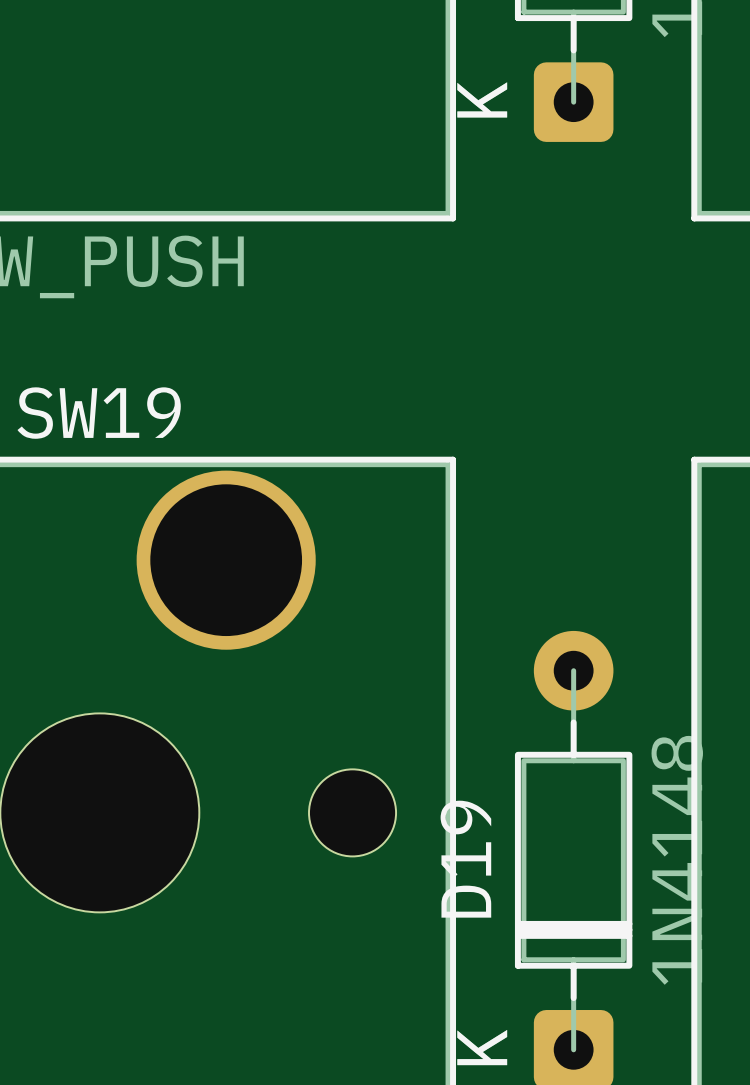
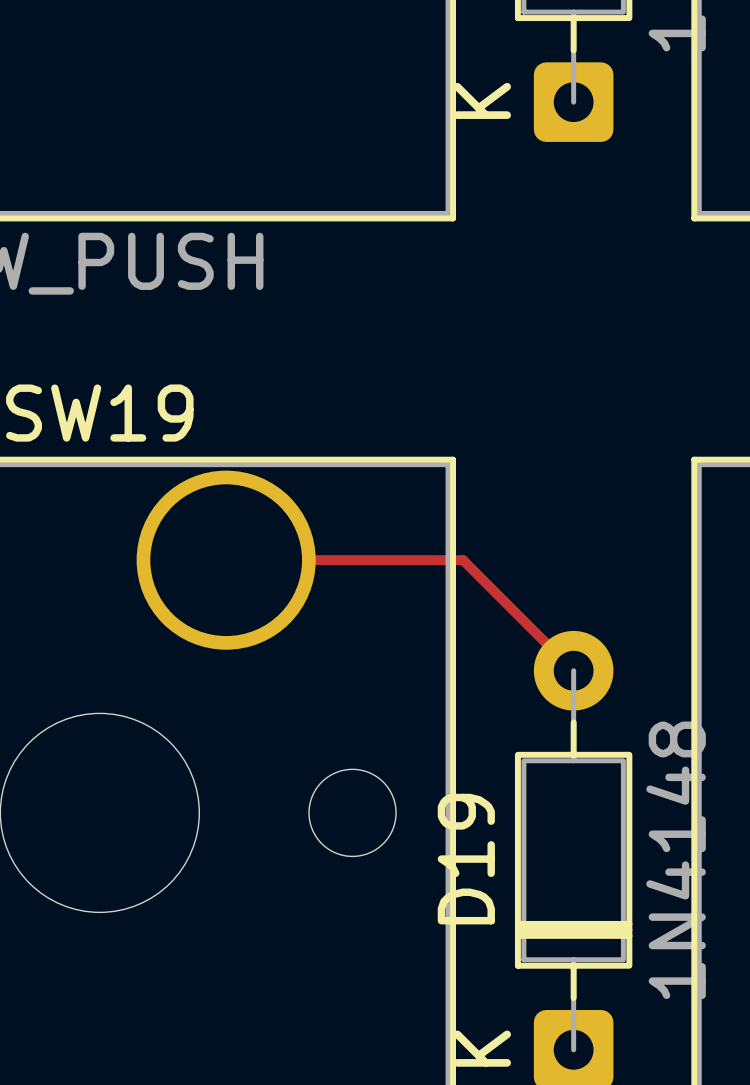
track: none -> (226, 560) (463, 560) (573, 670)

